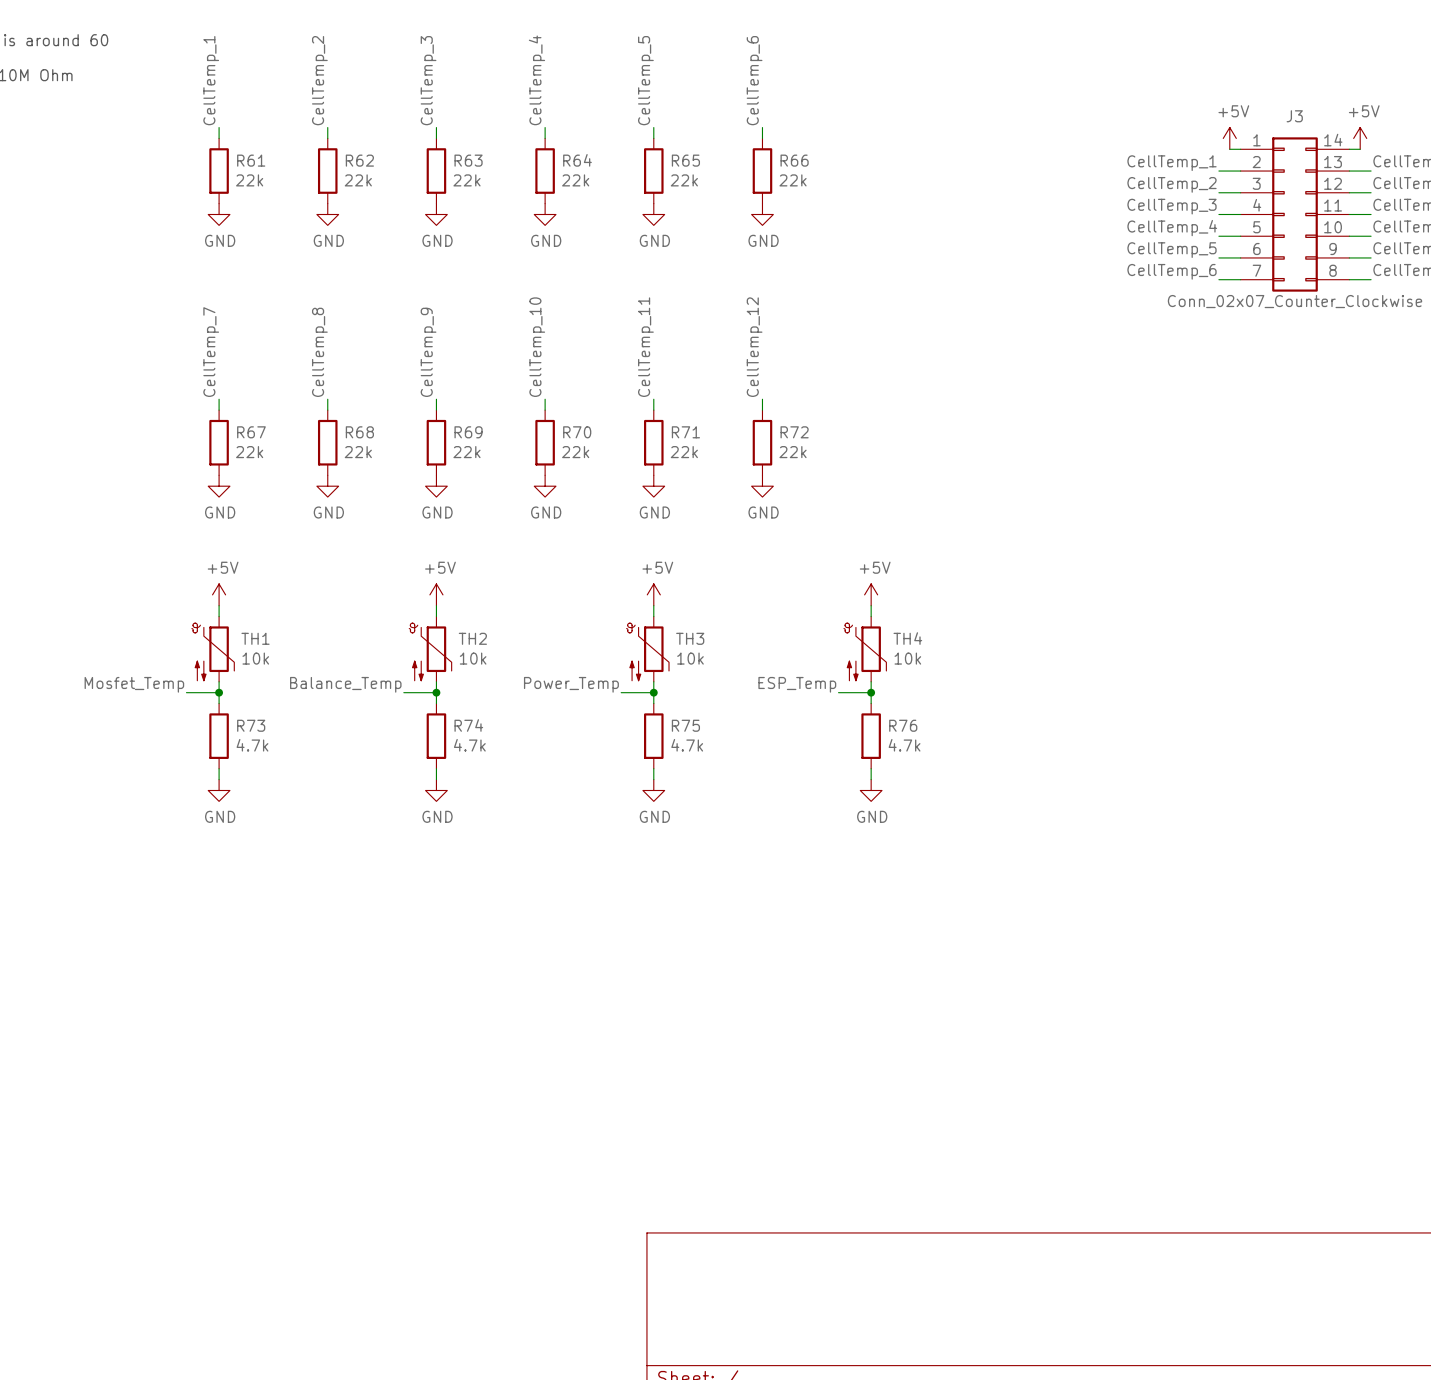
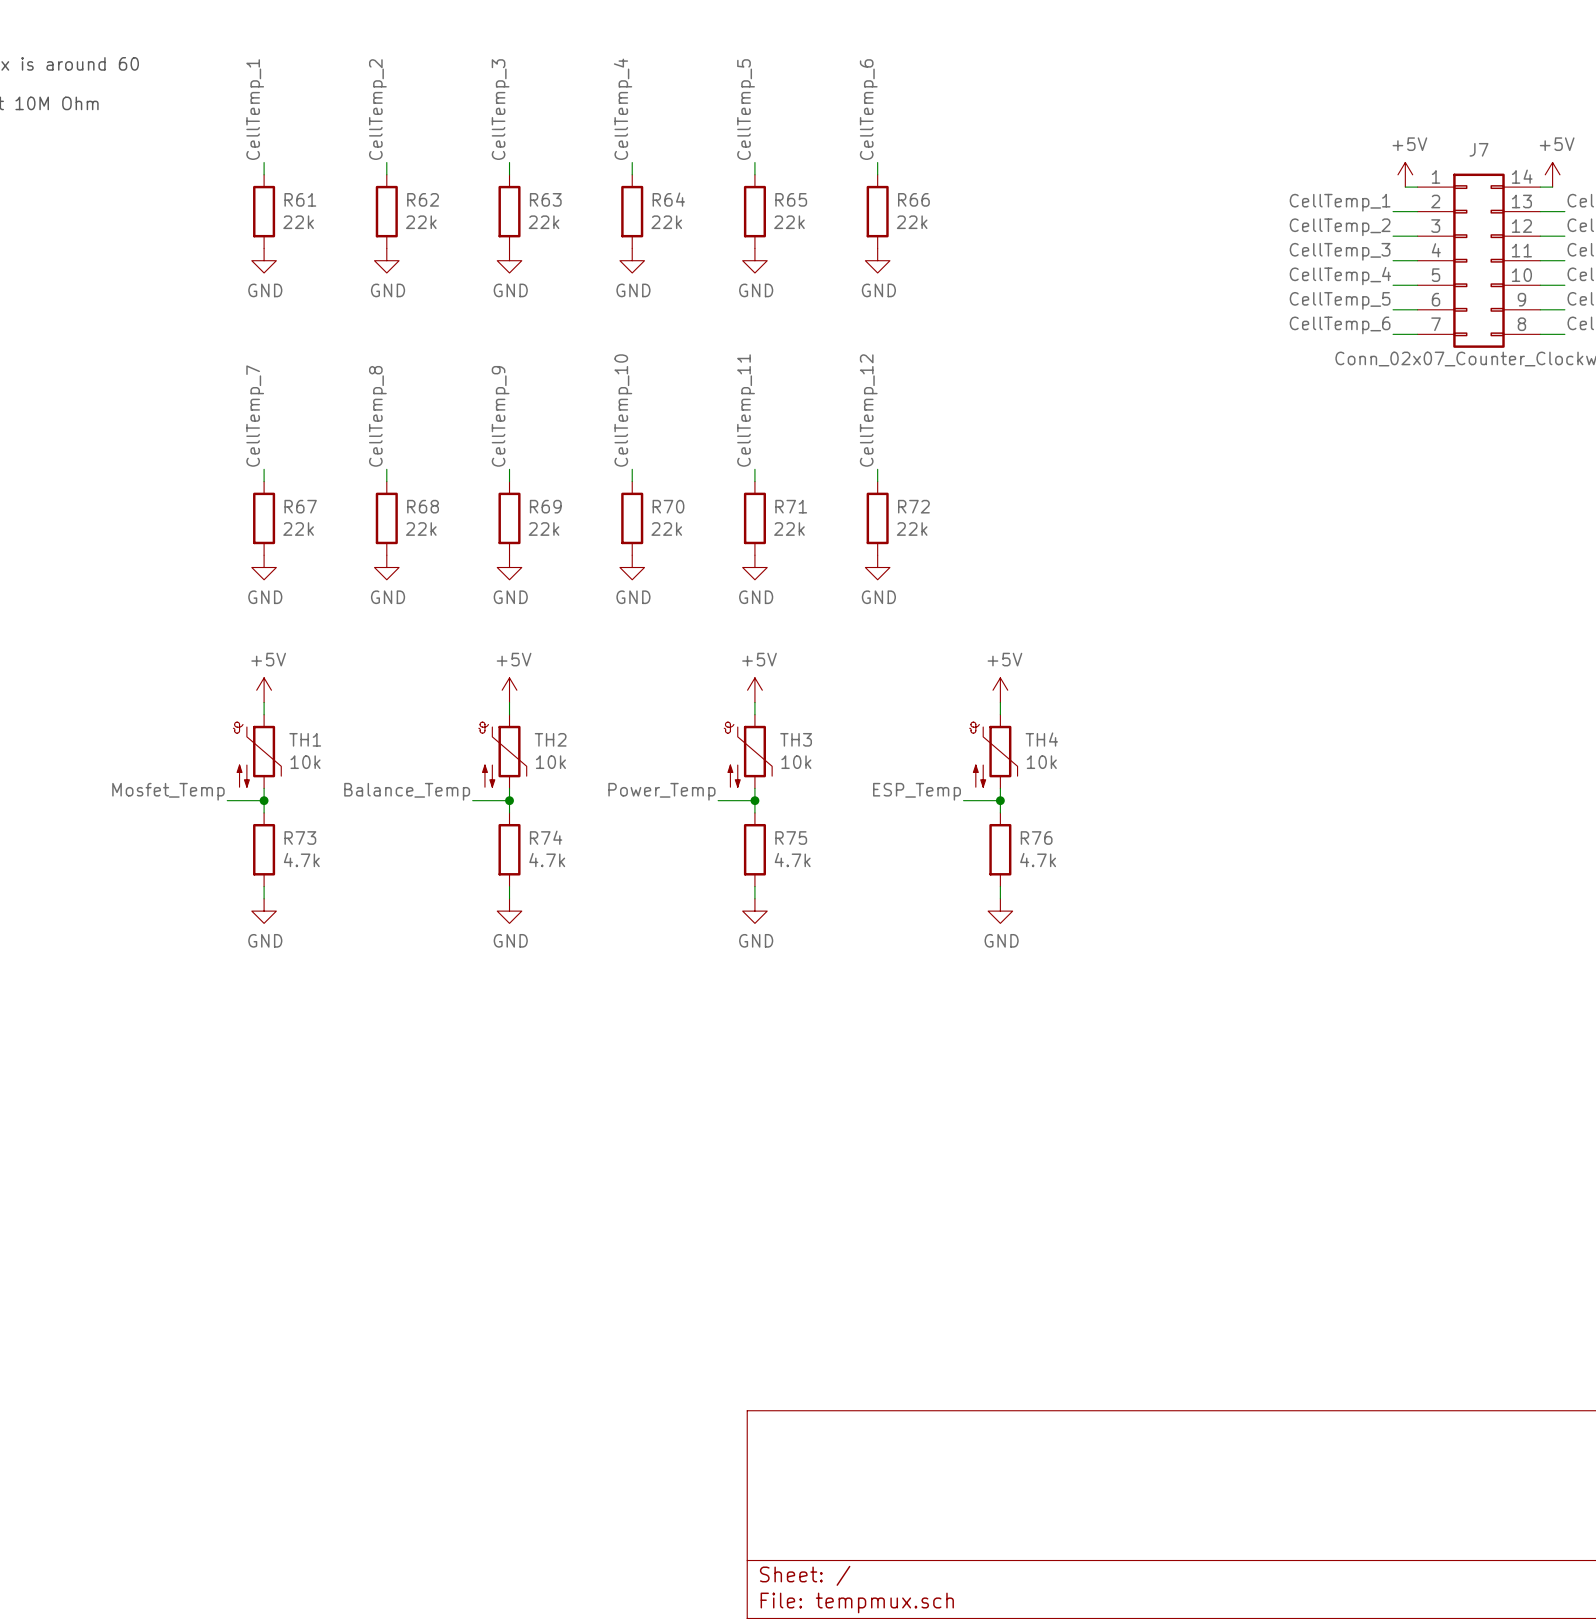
J3 name: J3 (1294, 116) -> J7 (1478, 149)

